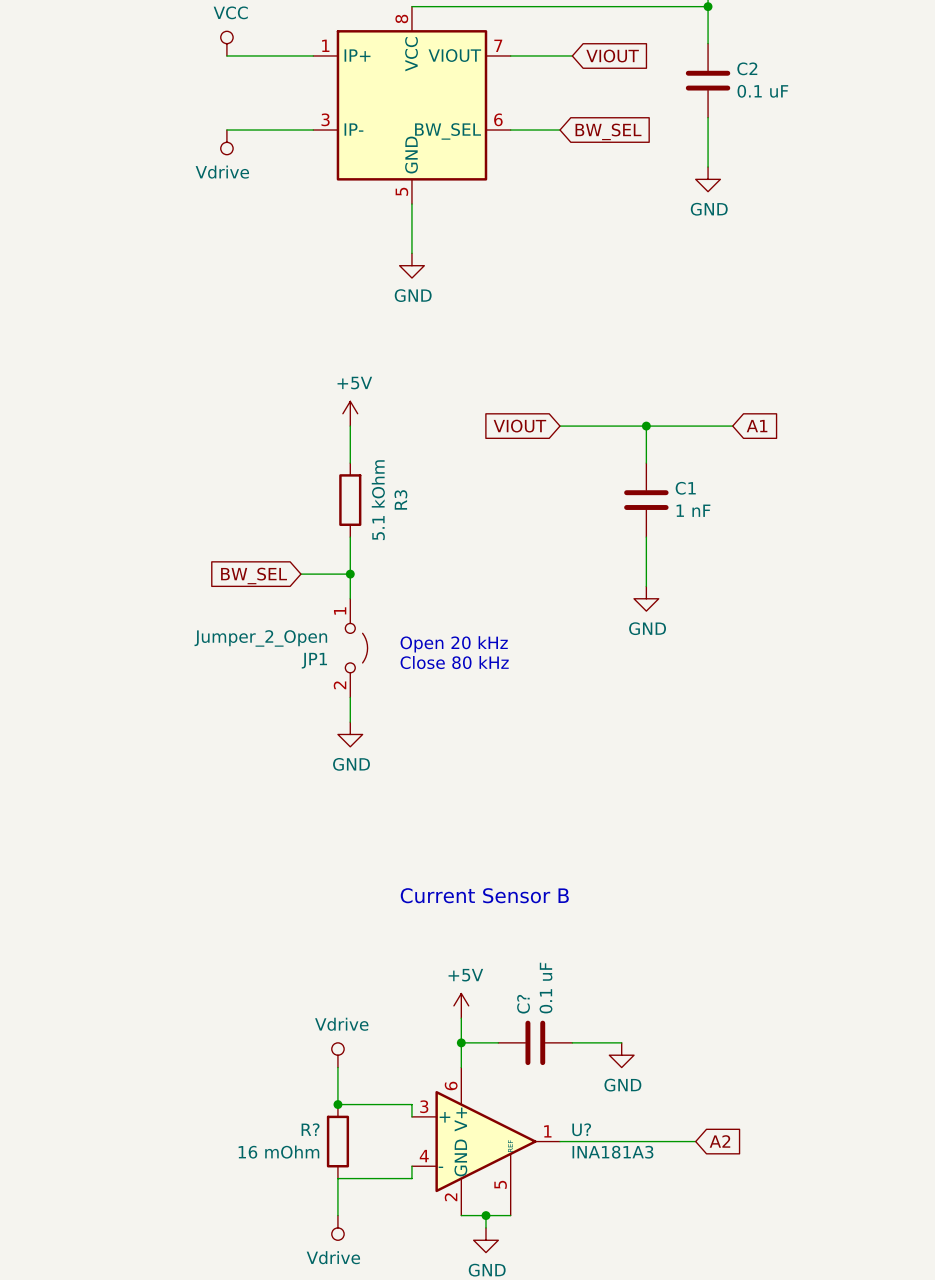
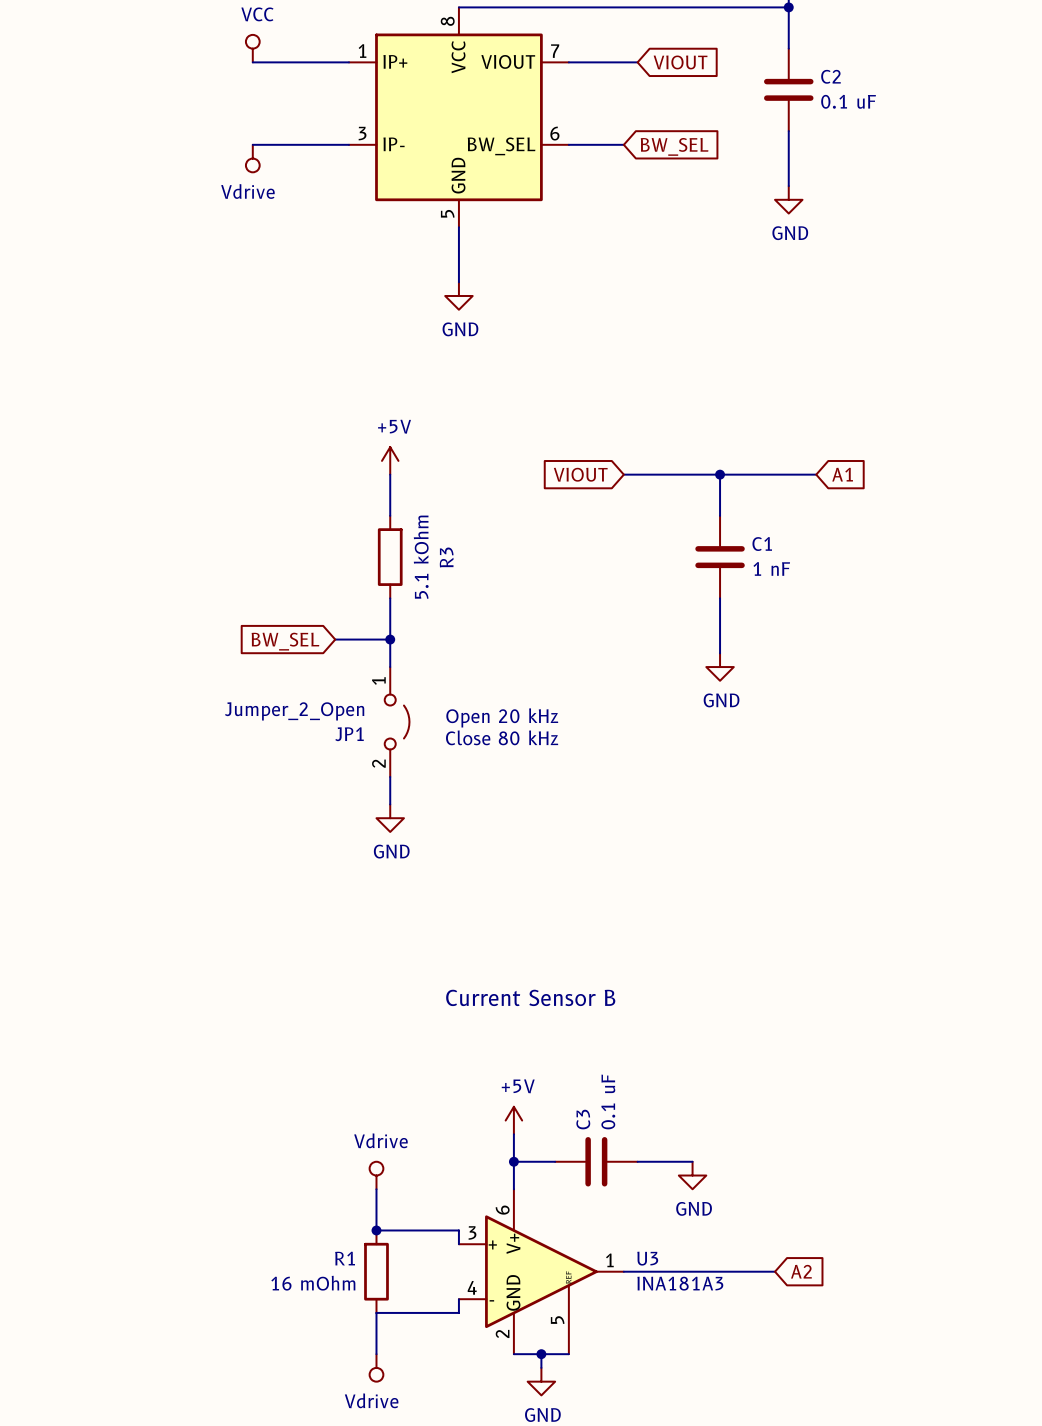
C? name: C? (523, 1004) -> C3 (583, 1119)
R? name: R? (310, 1129) -> R1 (345, 1258)
U? name: U? (581, 1129) -> U3 (647, 1258)

